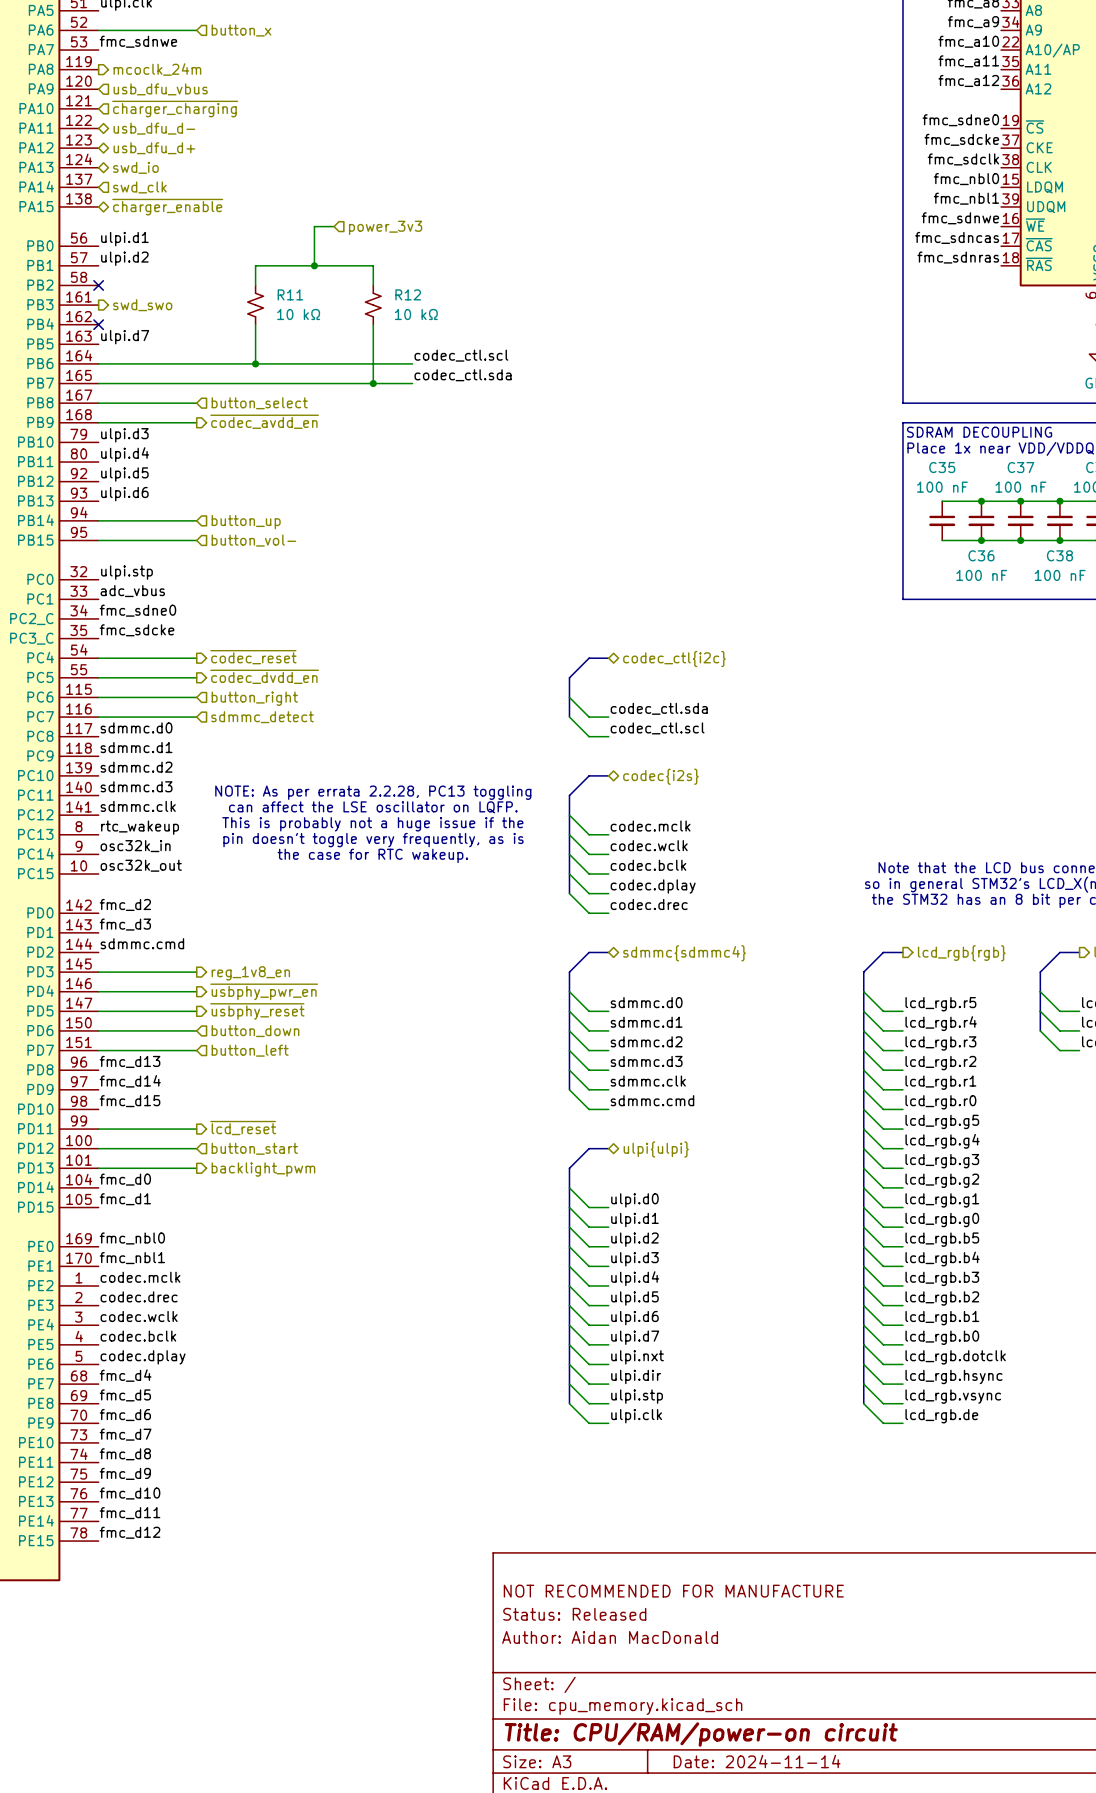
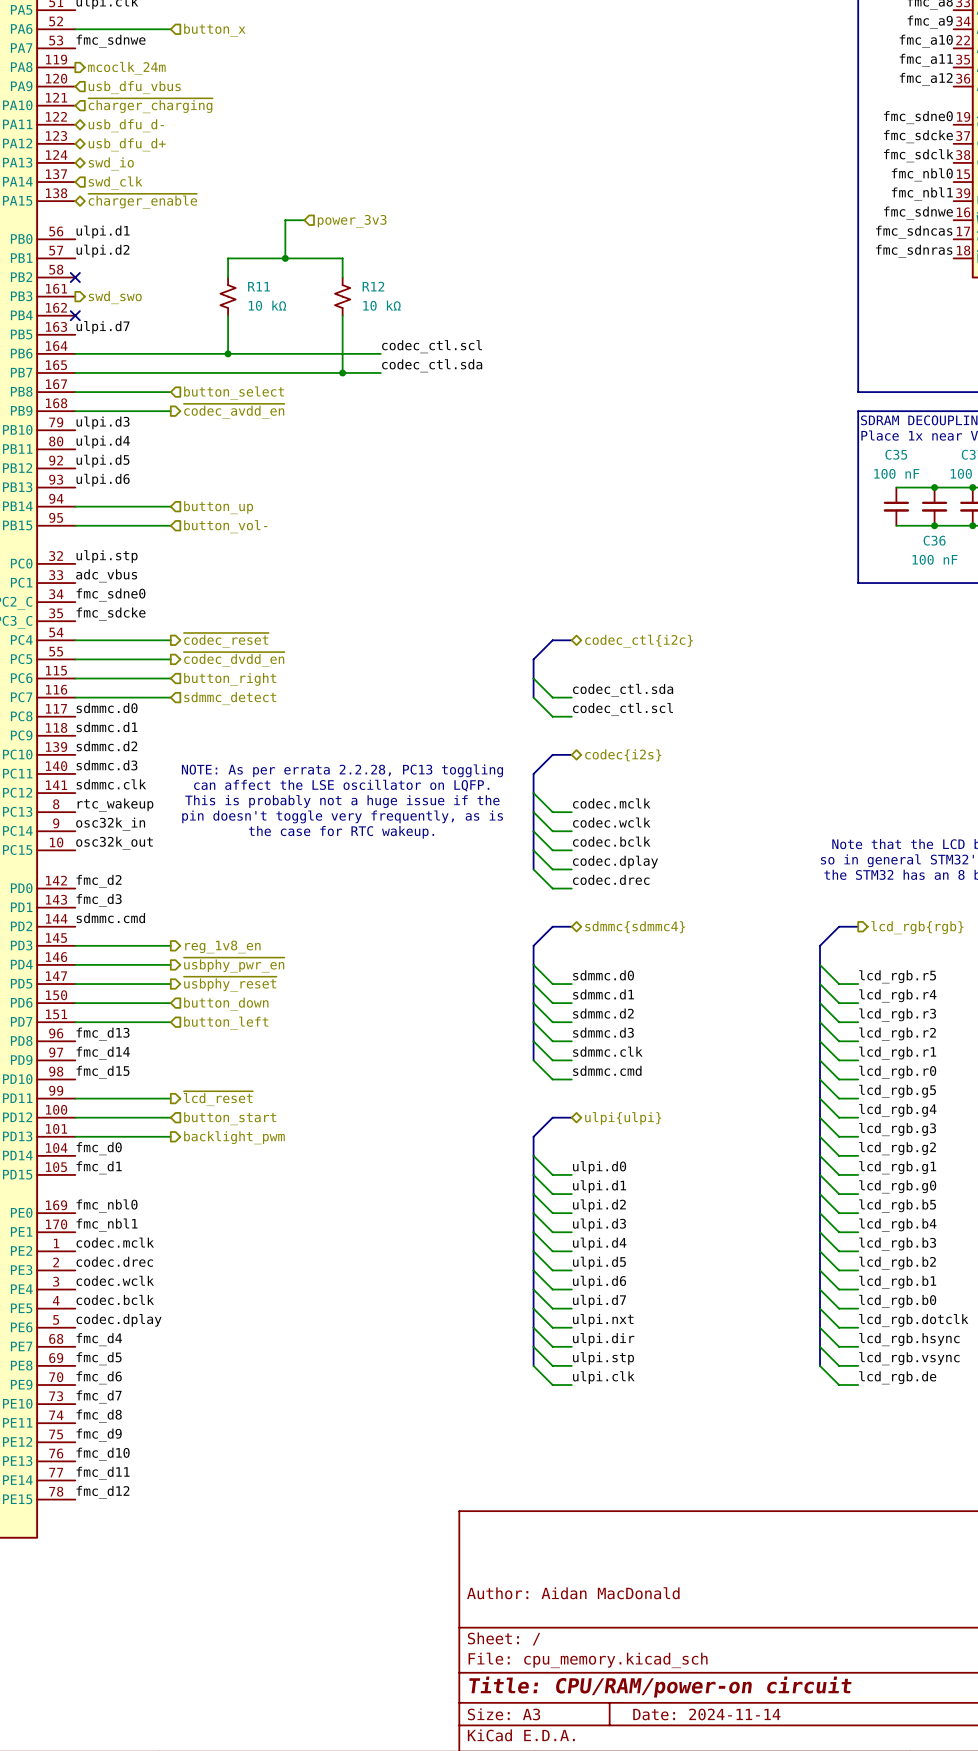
title block: NOT RECOMMENDED FOR MANUFACTURE (673, 1591) -> none
title block: Status: Released (574, 1614) -> none

